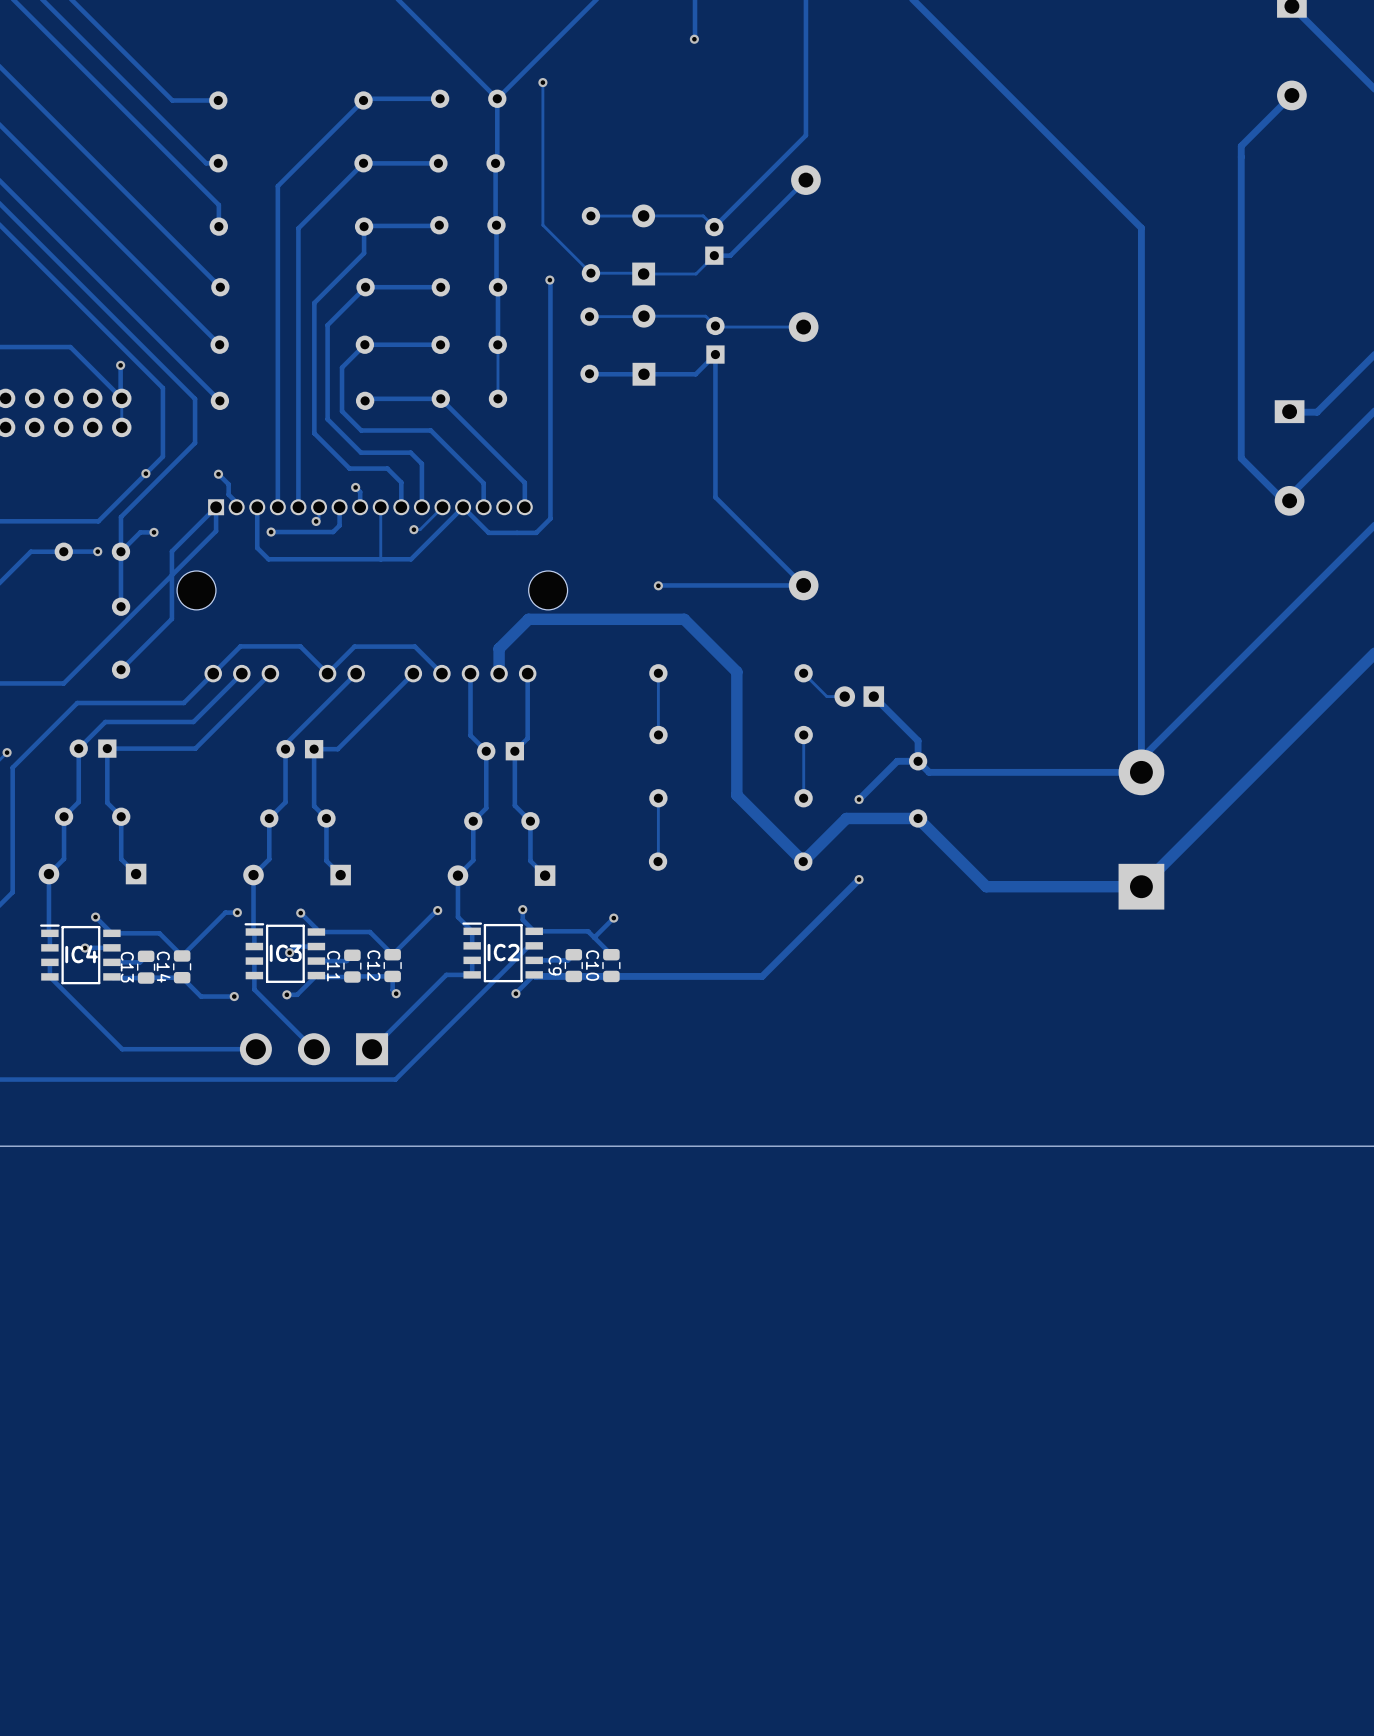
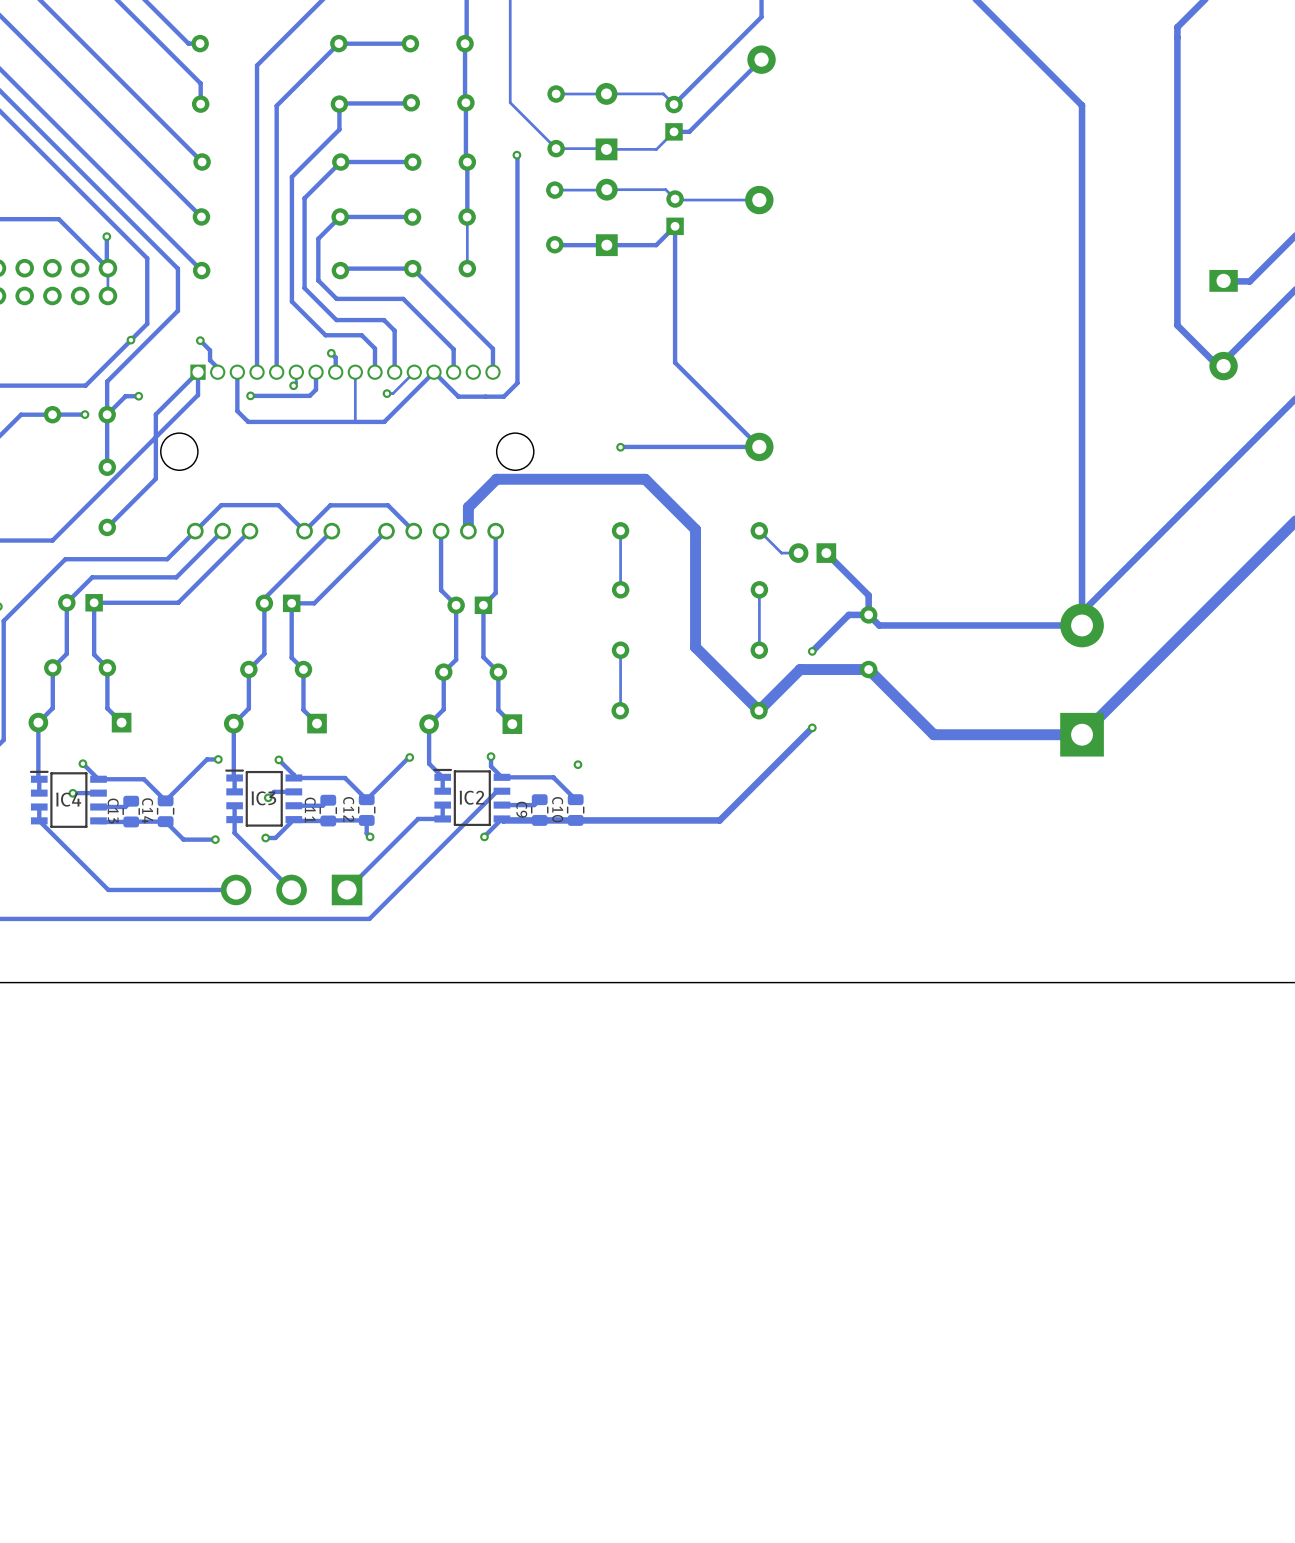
track: (613, 918) (594, 937) -> none

